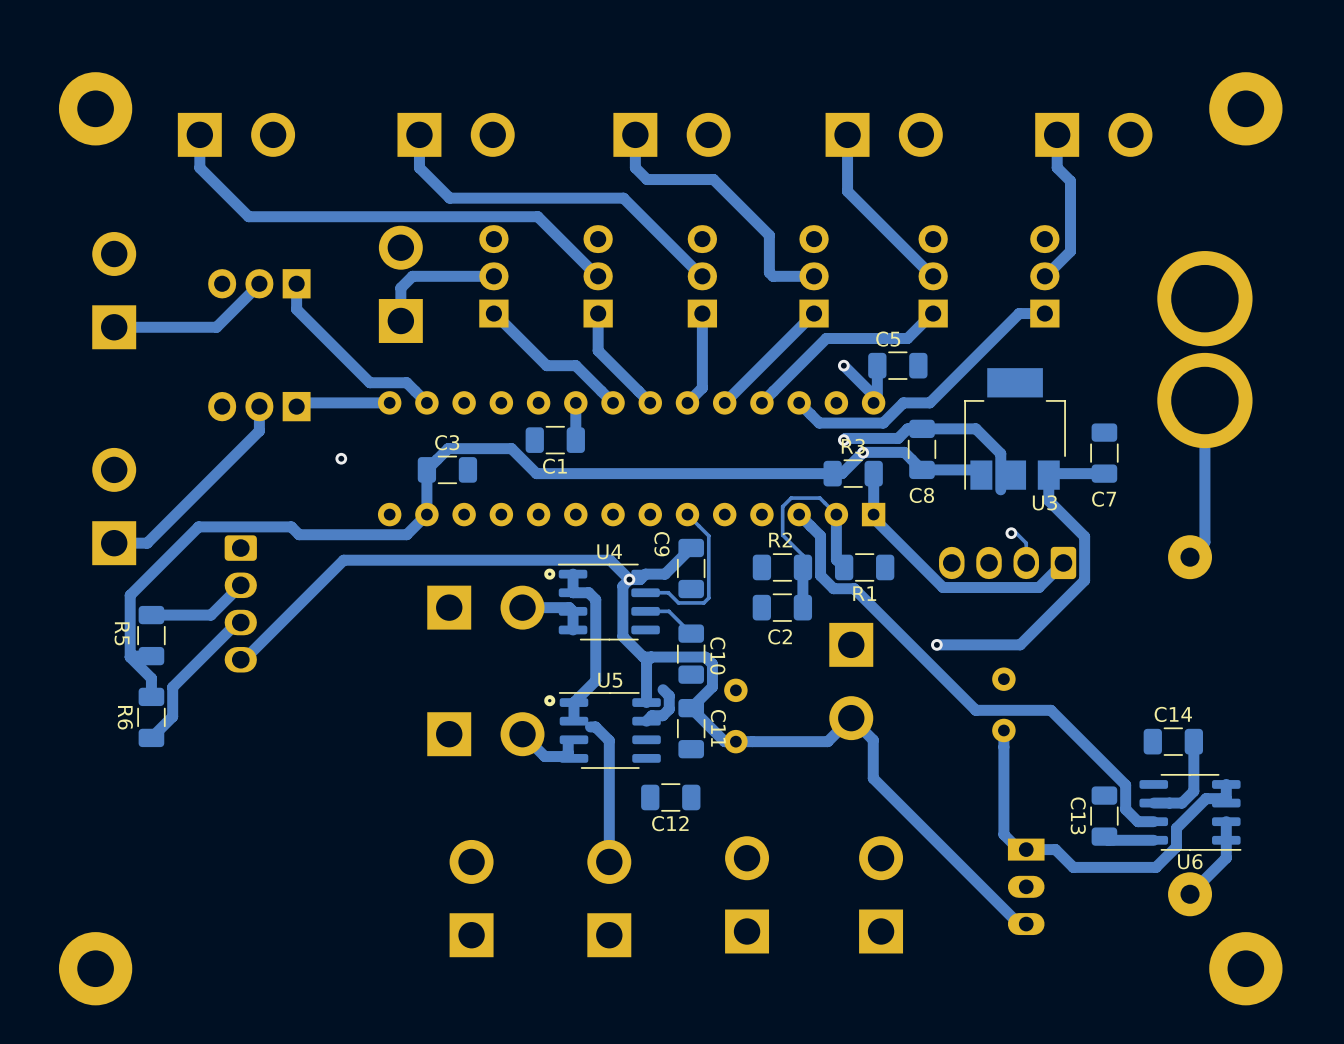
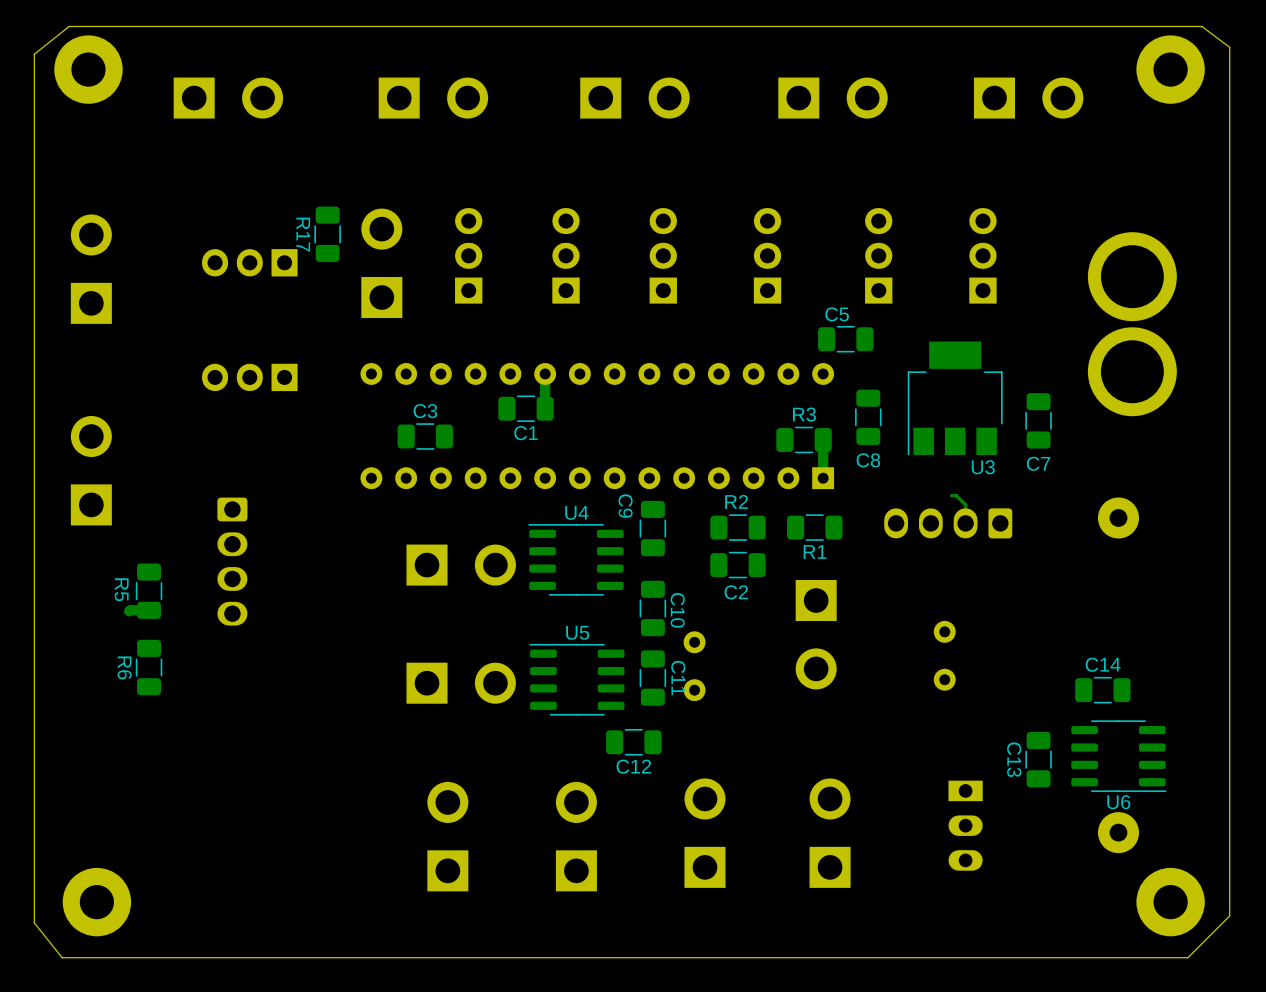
board edge: none -> (1201, 26) (1229, 47) (1229, 916) (1187, 957) (62, 957) (34, 922) (34, 54) (69, 26) (1201, 26)
part position: (95, 108) -> (88, 69)
part position: (1245, 108) -> (1170, 69)
track: (199, 134) (199, 167) (248, 216) (537, 216) (598, 276) -> none
part position: (236, 134) -> (228, 98)
track: (419, 134) (419, 167) (449, 198) (623, 198) (694, 269) -> none
part position: (456, 134) -> (433, 98)
track: (635, 134) (635, 167) (647, 179) (713, 179) (769, 235) (769, 272) (773, 276) (814, 276) -> none
part position: (672, 134) -> (634, 98)
track: (847, 134) (847, 191) (933, 276) -> none
part position: (884, 134) -> (833, 98)
track: (1057, 134) (1057, 167) (1070, 181) (1070, 251) (1044, 276) -> none
part position: (1093, 134) -> (1028, 98)
R17: none -> (327, 234)
track: (493, 276) (412, 276) (400, 288) (400, 320) -> none
track: (259, 283) (216, 327) (114, 327) -> none
track: (296, 283) (296, 309) (369, 382) (406, 382) (426, 402) -> none
part position: (114, 290) -> (91, 269)
track: (493, 313) (546, 365) (575, 365) (613, 402) -> none
track: (598, 313) (598, 350) (650, 402) -> none
track: (702, 313) (702, 388) (687, 402) -> none
track: (814, 313) (724, 402) -> none
track: (933, 313) (907, 338) (826, 338) (761, 402) -> none
track: (1044, 313) (1019, 313) (929, 402) (903, 402) (883, 423) (819, 423) (799, 402) -> none
via: (843, 365) -> none
track: (877, 365) (877, 399) (873, 402) (873, 395) (843, 365) -> none
track: (1204, 400) (1204, 542) (1190, 557) -> none
track: (389, 402) (300, 402) (296, 406) -> none
track: (259, 406) (259, 430) (147, 543) (114, 543) -> none
track: (843, 440) (845, 438) (898, 438) (907, 428) (975, 428) (1000, 453) (1000, 489) -> none
via: (843, 440) -> none
via: (863, 452) -> none
via: (341, 458) -> none
track: (1104, 473) (1048, 475) (1048, 500) (1084, 536) (1084, 580) (1020, 644) (936, 644) -> none
track: (981, 475) (976, 469) (922, 469) (904, 452) (863, 452) (841, 473) (536, 473) (511, 448) (448, 448) (426, 469) (426, 514) (406, 534) (299, 534) (291, 526) (198, 526) (130, 595) (130, 657) (151, 678) (151, 696) -> none
part position: (114, 506) -> (91, 470)
track: (687, 514) (708, 535) (708, 598) (703, 602) (678, 602) (668, 592) (645, 592) -> none
track: (799, 514) (820, 535) (820, 575) (833, 588) (854, 588) (975, 710) (1050, 710) (1125, 785) (1125, 809) (1138, 821) (1153, 821) -> none
track: (873, 514) (873, 518) (943, 587) (1038, 587) (1063, 562) -> none
via: (1011, 533) -> none
track: (691, 547) (665, 574) (645, 574) (640, 579) (629, 579) -> none
track: (844, 567) (836, 559) (836, 514) (819, 498) (791, 498) (782, 506) (782, 535) (802, 555) (802, 607) -> none
drawing: [544, 568, 556, 580] -> none
track: (573, 574) (573, 592) (588, 592) (595, 599) (595, 680) (573, 702) (573, 717) -> none
track: (629, 579) (622, 586) (622, 636) (643, 657) (705, 657) (712, 664) (712, 686) (691, 708) (724, 741) (827, 741) (851, 718) (873, 740) (873, 778) (1018, 924) (1026, 924) -> none
track: (629, 579) (610, 560) (343, 560) (244, 659) (240, 659) -> none
via: (629, 579) -> none
track: (240, 585) (211, 615) (151, 615) -> none
track: (522, 607) (569, 607) (573, 611) (573, 629) -> none
track: (645, 611) (668, 611) (691, 633) -> none
track: (240, 622) (237, 622) (172, 687) (172, 716) (151, 737) -> none
via: (936, 644) -> none
track: (651, 657) (646, 661) (646, 702) -> none
part position: (851, 681) -> (816, 634)
track: (663, 689) (669, 695) (669, 709) (662, 715) (651, 715) (646, 721) -> none
drawing: [544, 695, 556, 707] -> none
track: (590, 726) (595, 726) (609, 740) (609, 861) -> none
track: (1003, 730) (1003, 834) (1018, 849) (1055, 849) (1073, 867) (1155, 867) (1176, 846) (1176, 828) (1206, 798) (1226, 798) (1226, 784) -> none
track: (522, 734) (544, 756) (564, 756) (568, 752) (568, 741) -> none
track: (1193, 741) (1193, 791) (1181, 803) (1153, 803) -> none
track: (1226, 821) (1226, 857) (1190, 894) -> none
track: (1104, 836) (1108, 840) (1153, 840) -> none

